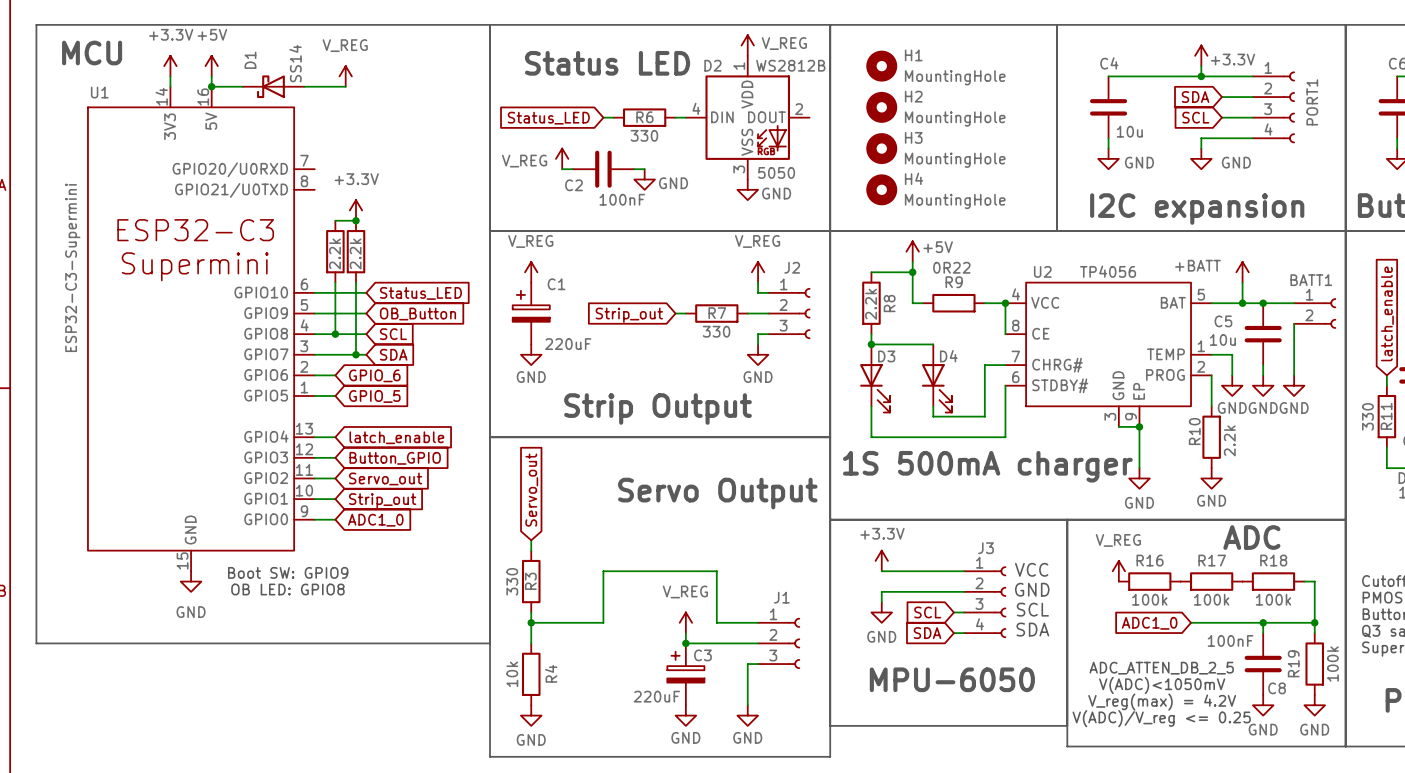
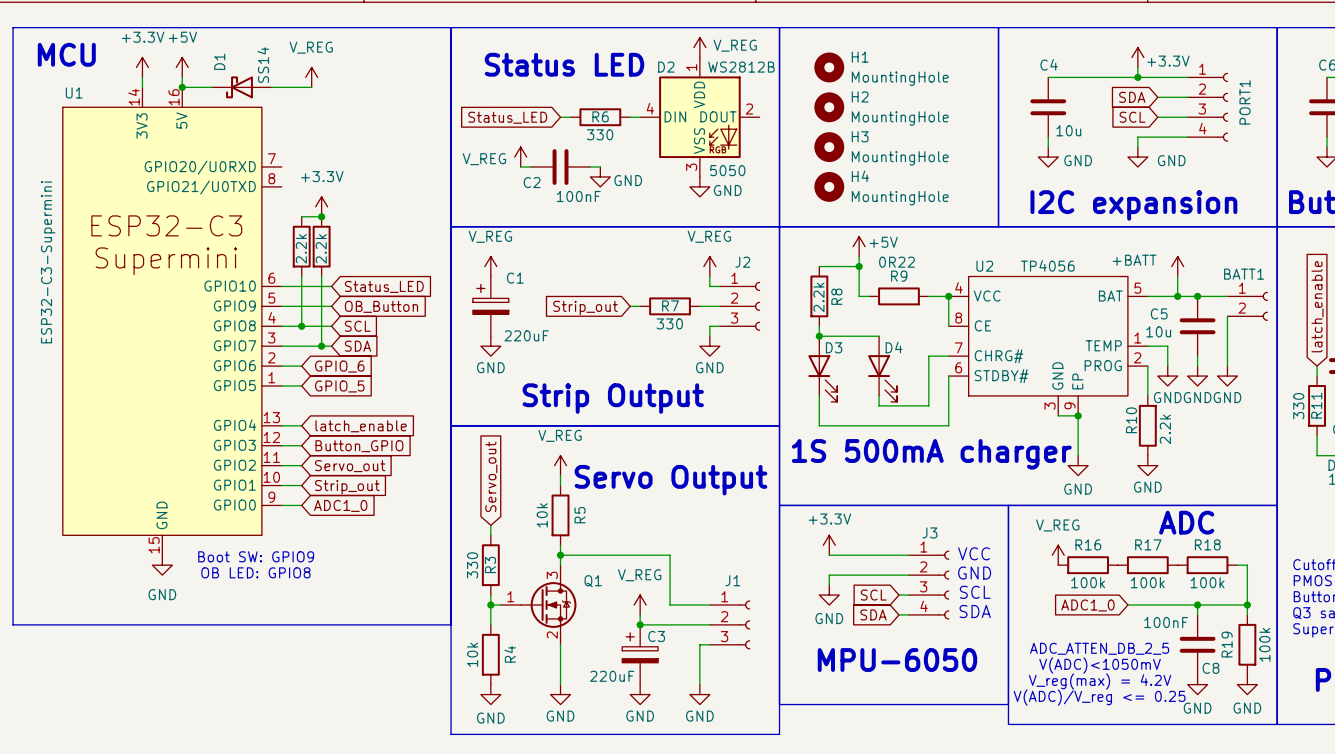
power symbol: none -> V_REG (560, 465)
wire: none -> (560, 475) (560, 485)
R5: none -> 10k (560, 515)
wire: none -> (560, 545) (560, 555)
junction: none -> (560, 555)
Q1: none -> (538, 604)
wire: none -> (560, 644) (560, 684)
power symbol: none -> GND (560, 694)

